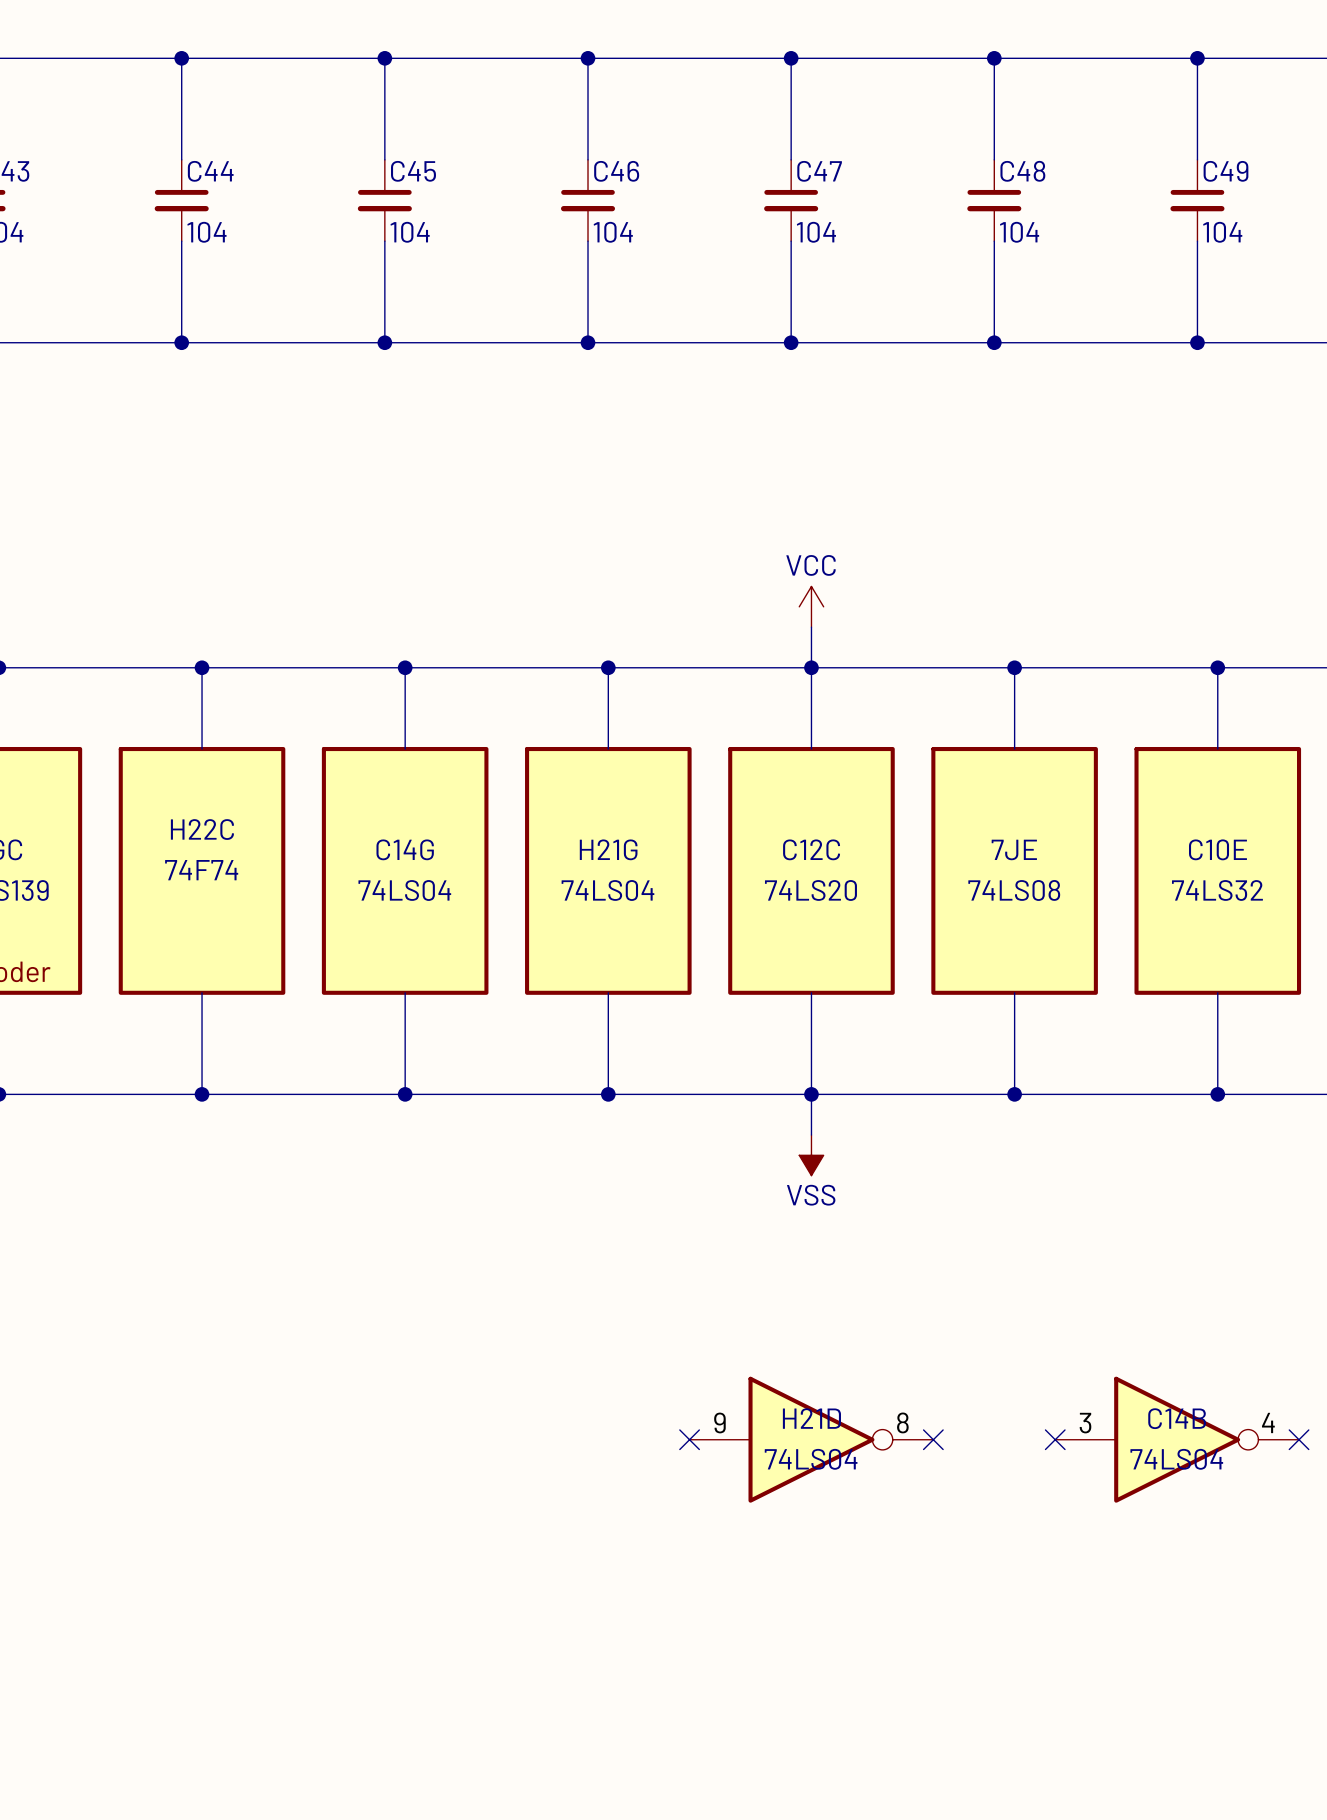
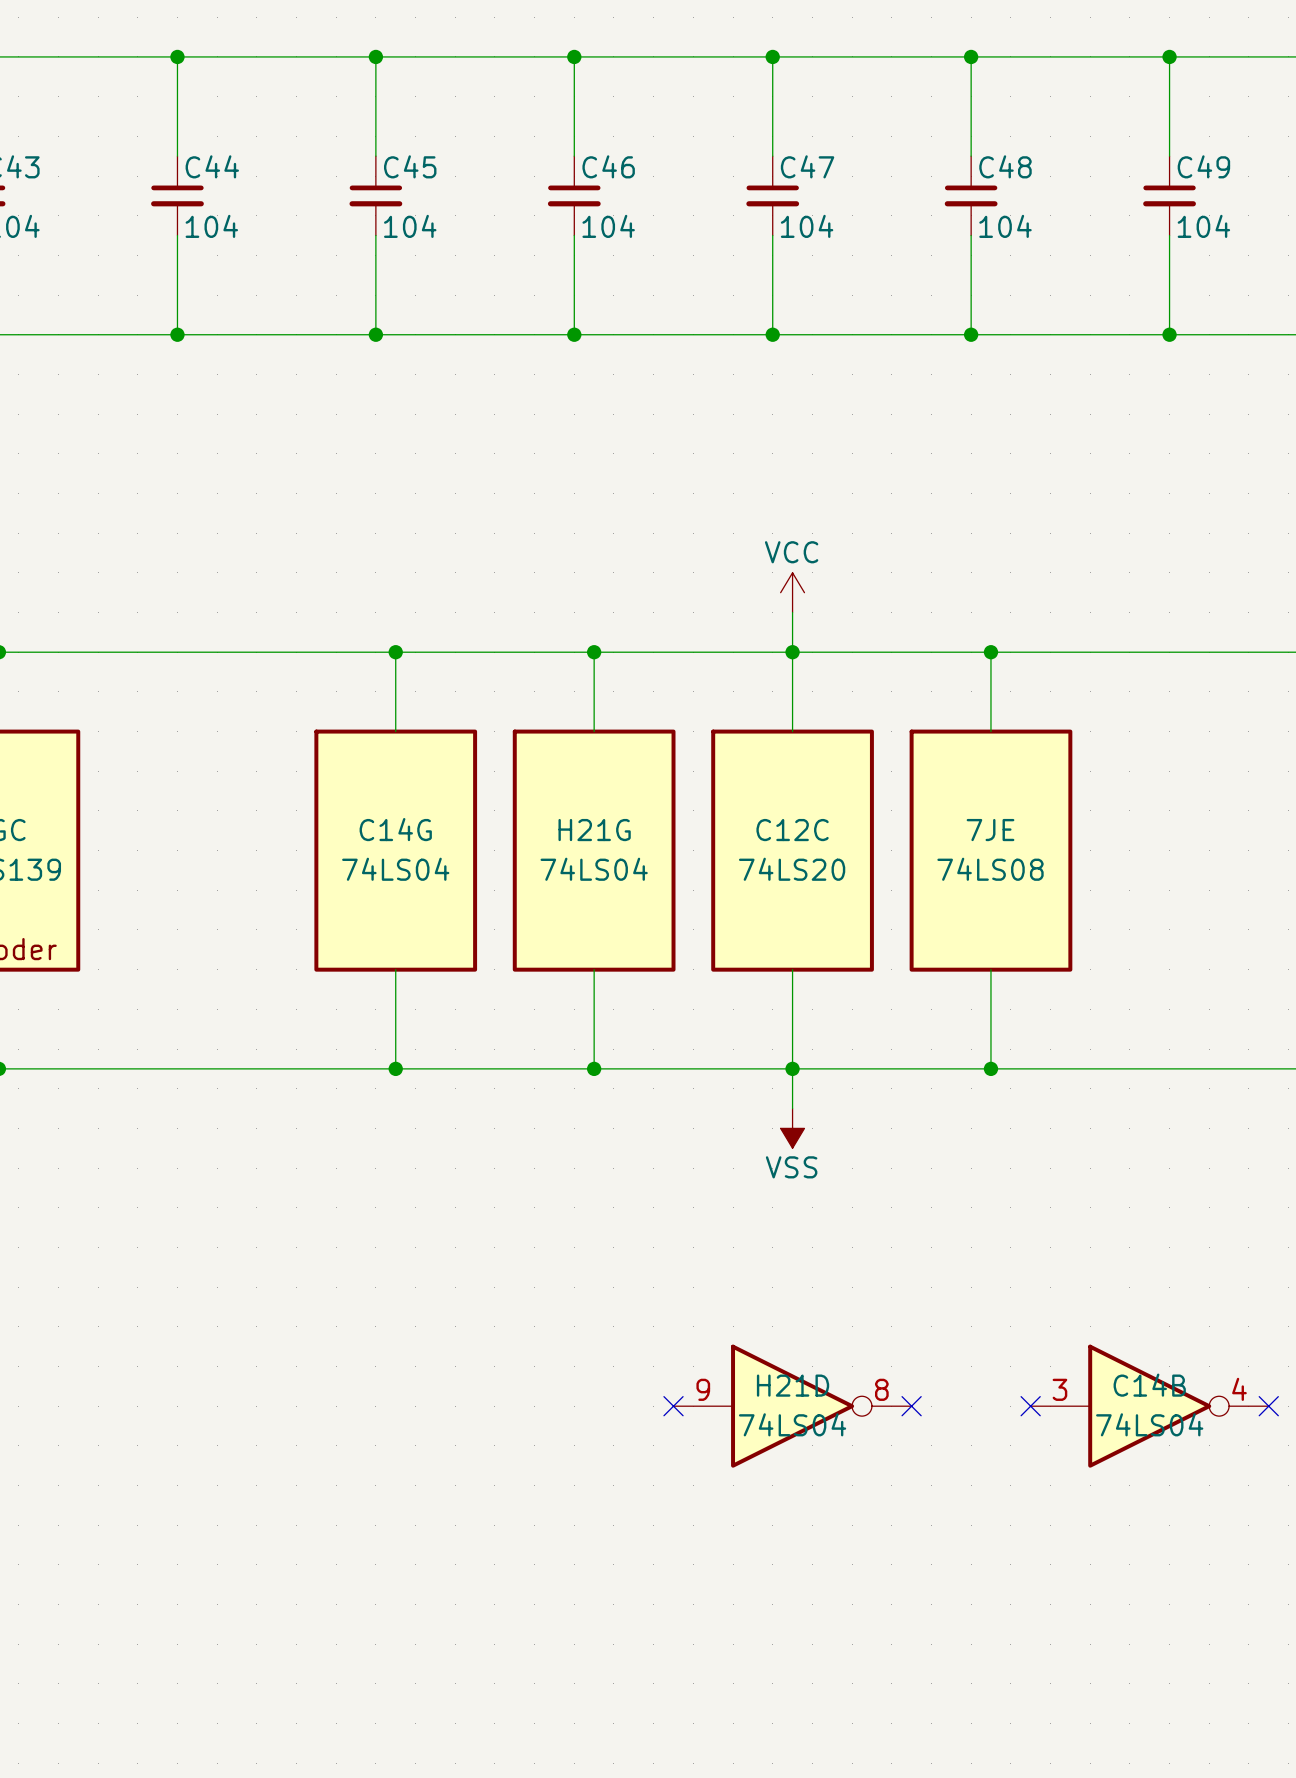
wire: (202, 667) (202, 749) -> none
junction: (202, 667) -> none
wire: (1217, 667) (1217, 749) -> none
junction: (1217, 667) -> none
H22C: 74F74 (202, 870) -> none
C10E: 74LS32 (1217, 870) -> none
wire: (202, 992) (202, 1094) -> none
wire: (1217, 992) (1217, 1094) -> none
junction: (202, 1094) -> none
junction: (1217, 1094) -> none

